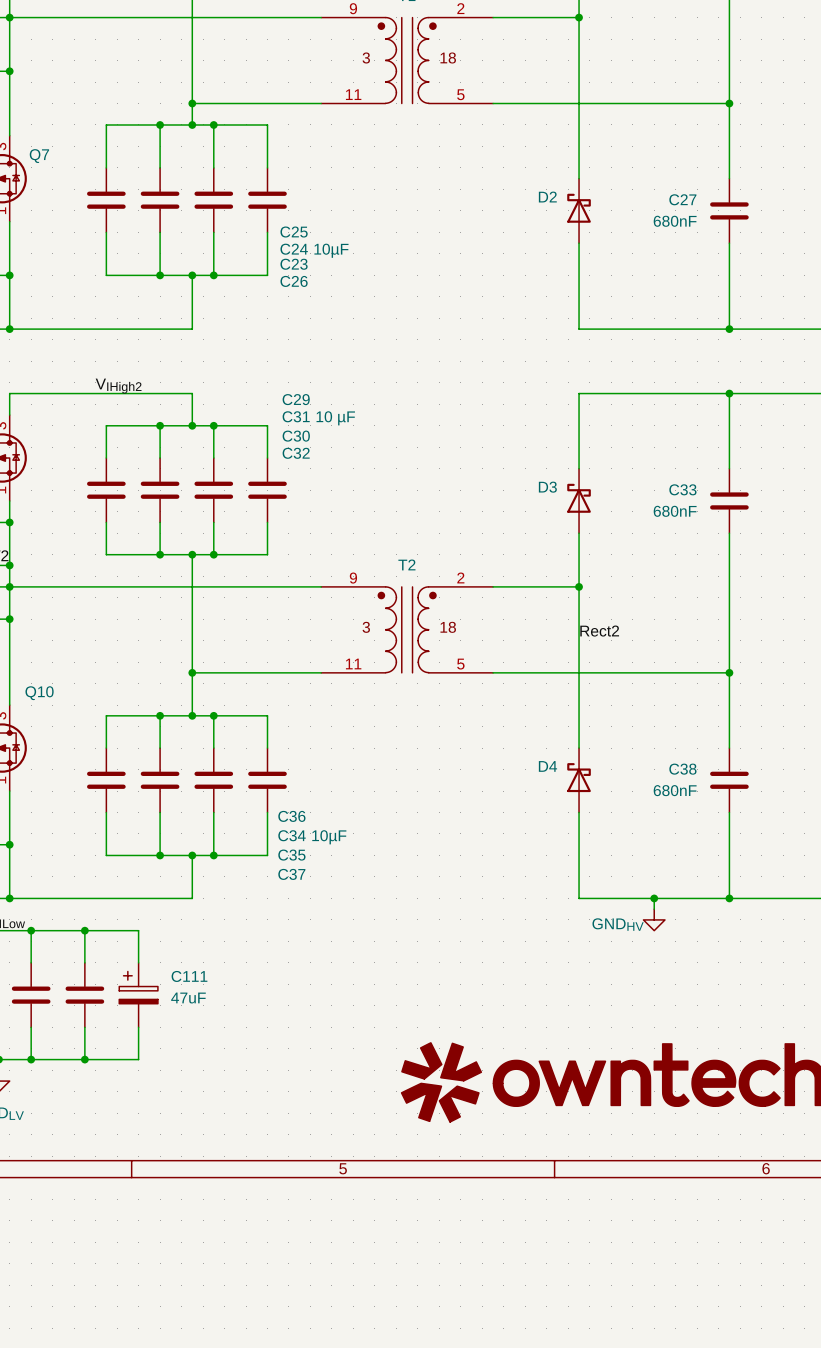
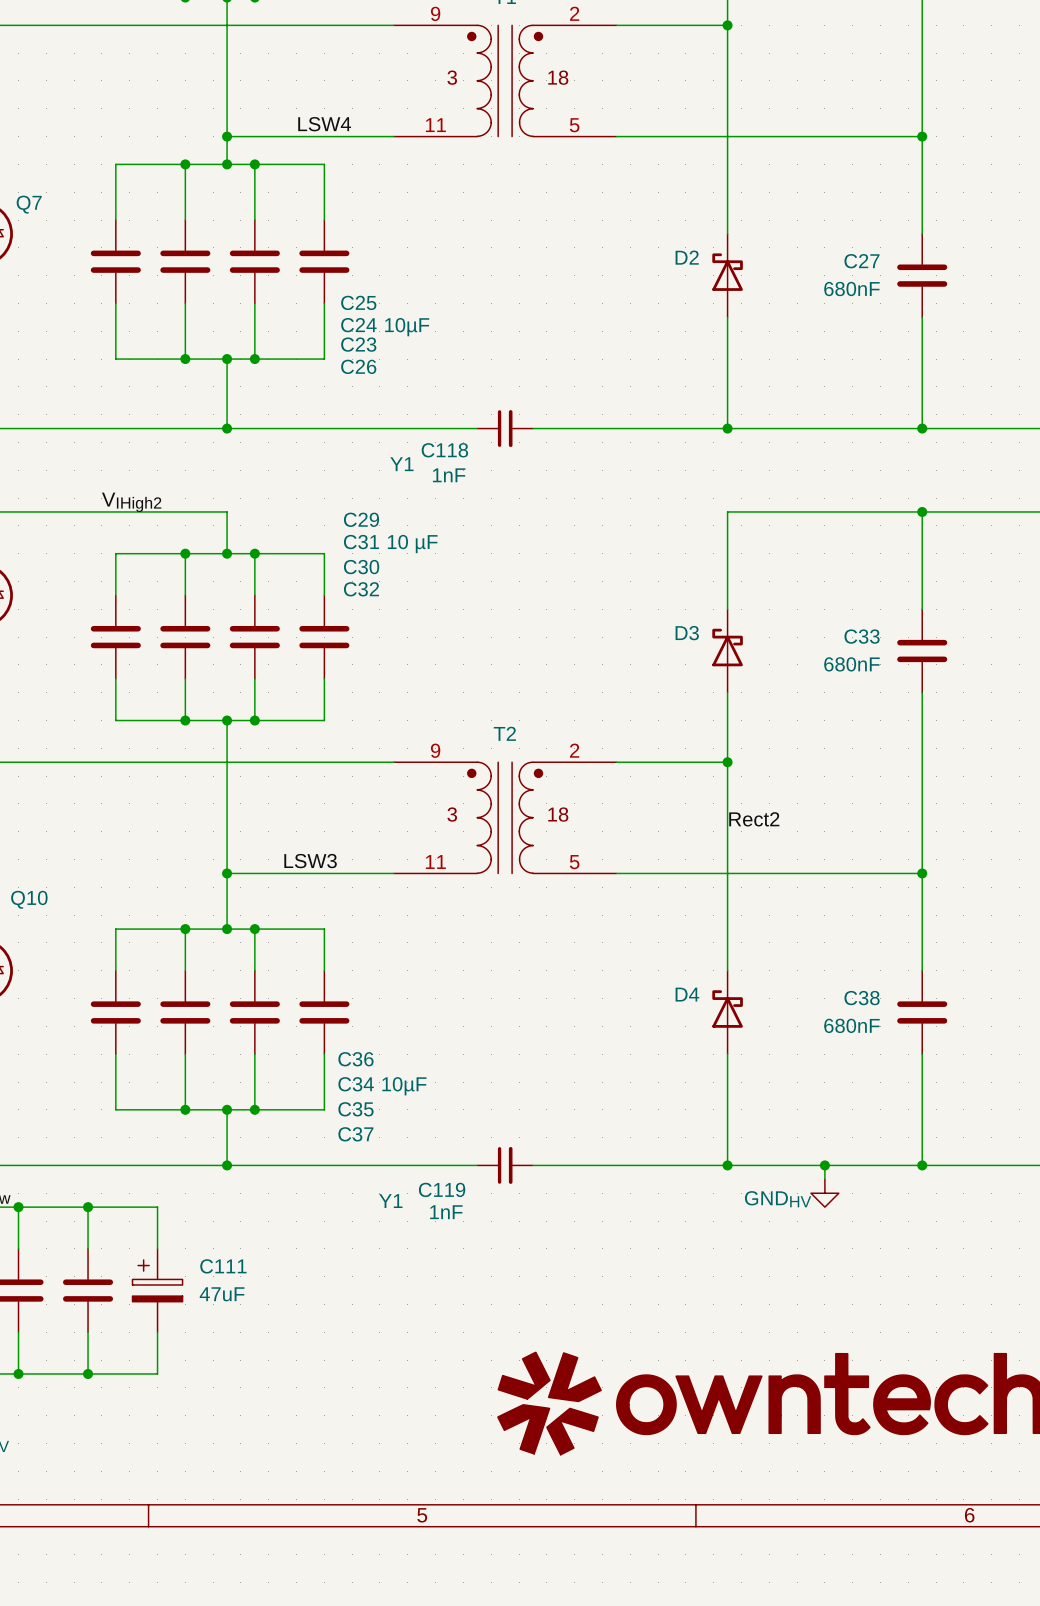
label: none -> LSW4 (324, 124)
wire: none -> (227, 428) (477, 428)
junction: none -> (227, 428)
C118: none -> 1nF (505, 428)
wire: none -> (532, 428) (727, 428)
junction: none -> (727, 428)
label: none -> LSW3 (310, 861)
wire: none -> (227, 1165) (477, 1165)
junction: none -> (227, 1165)
C119: none -> 1nF (505, 1165)
wire: none -> (532, 1165) (727, 1165)
junction: none -> (727, 1165)

